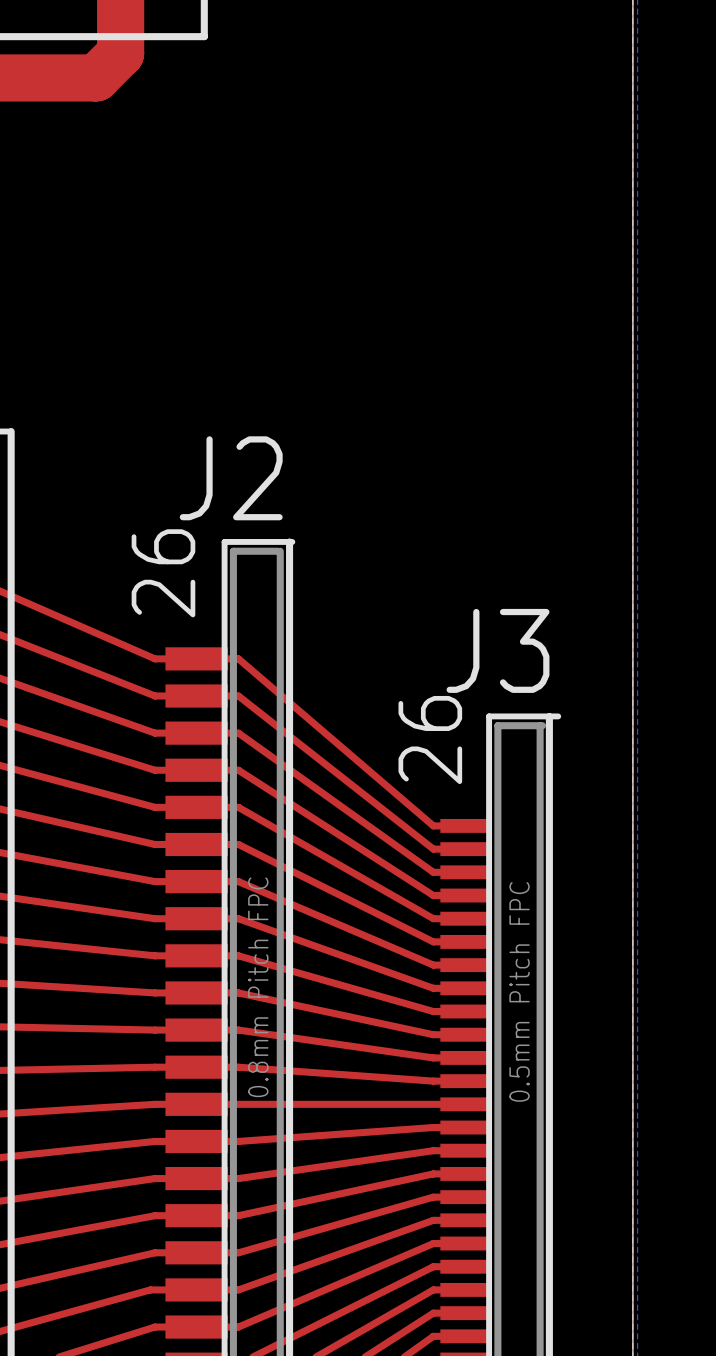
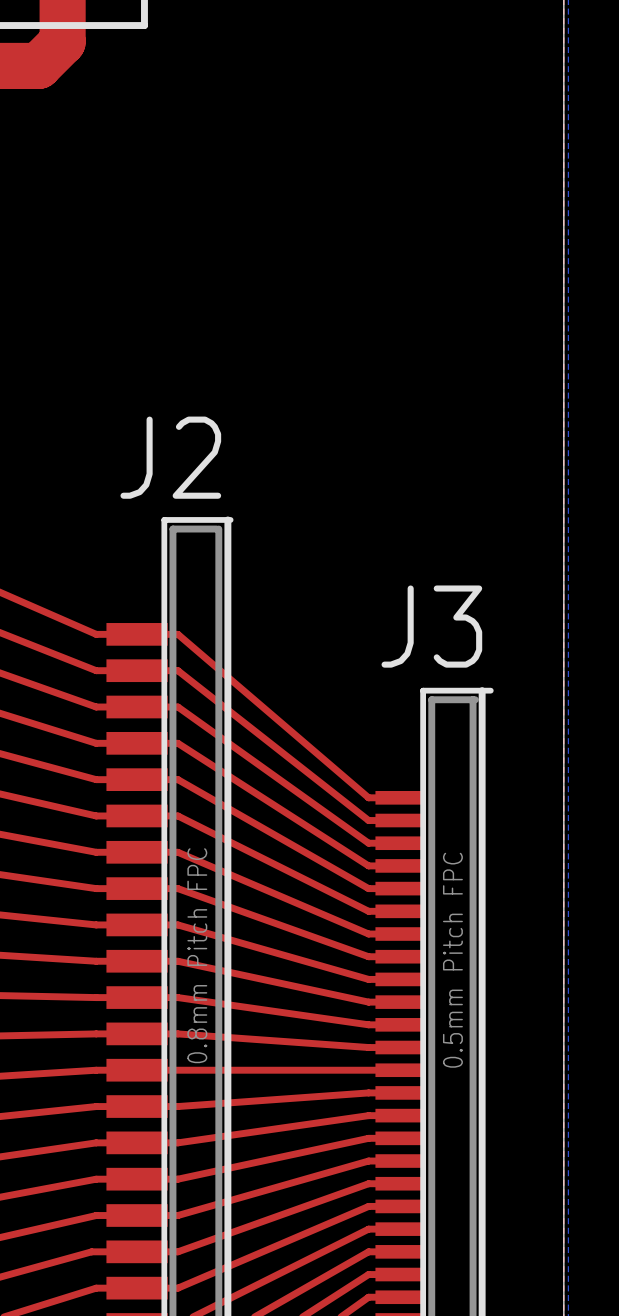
J2 text: 26 (163, 573) -> none
J3 text: 26 (430, 739) -> none

